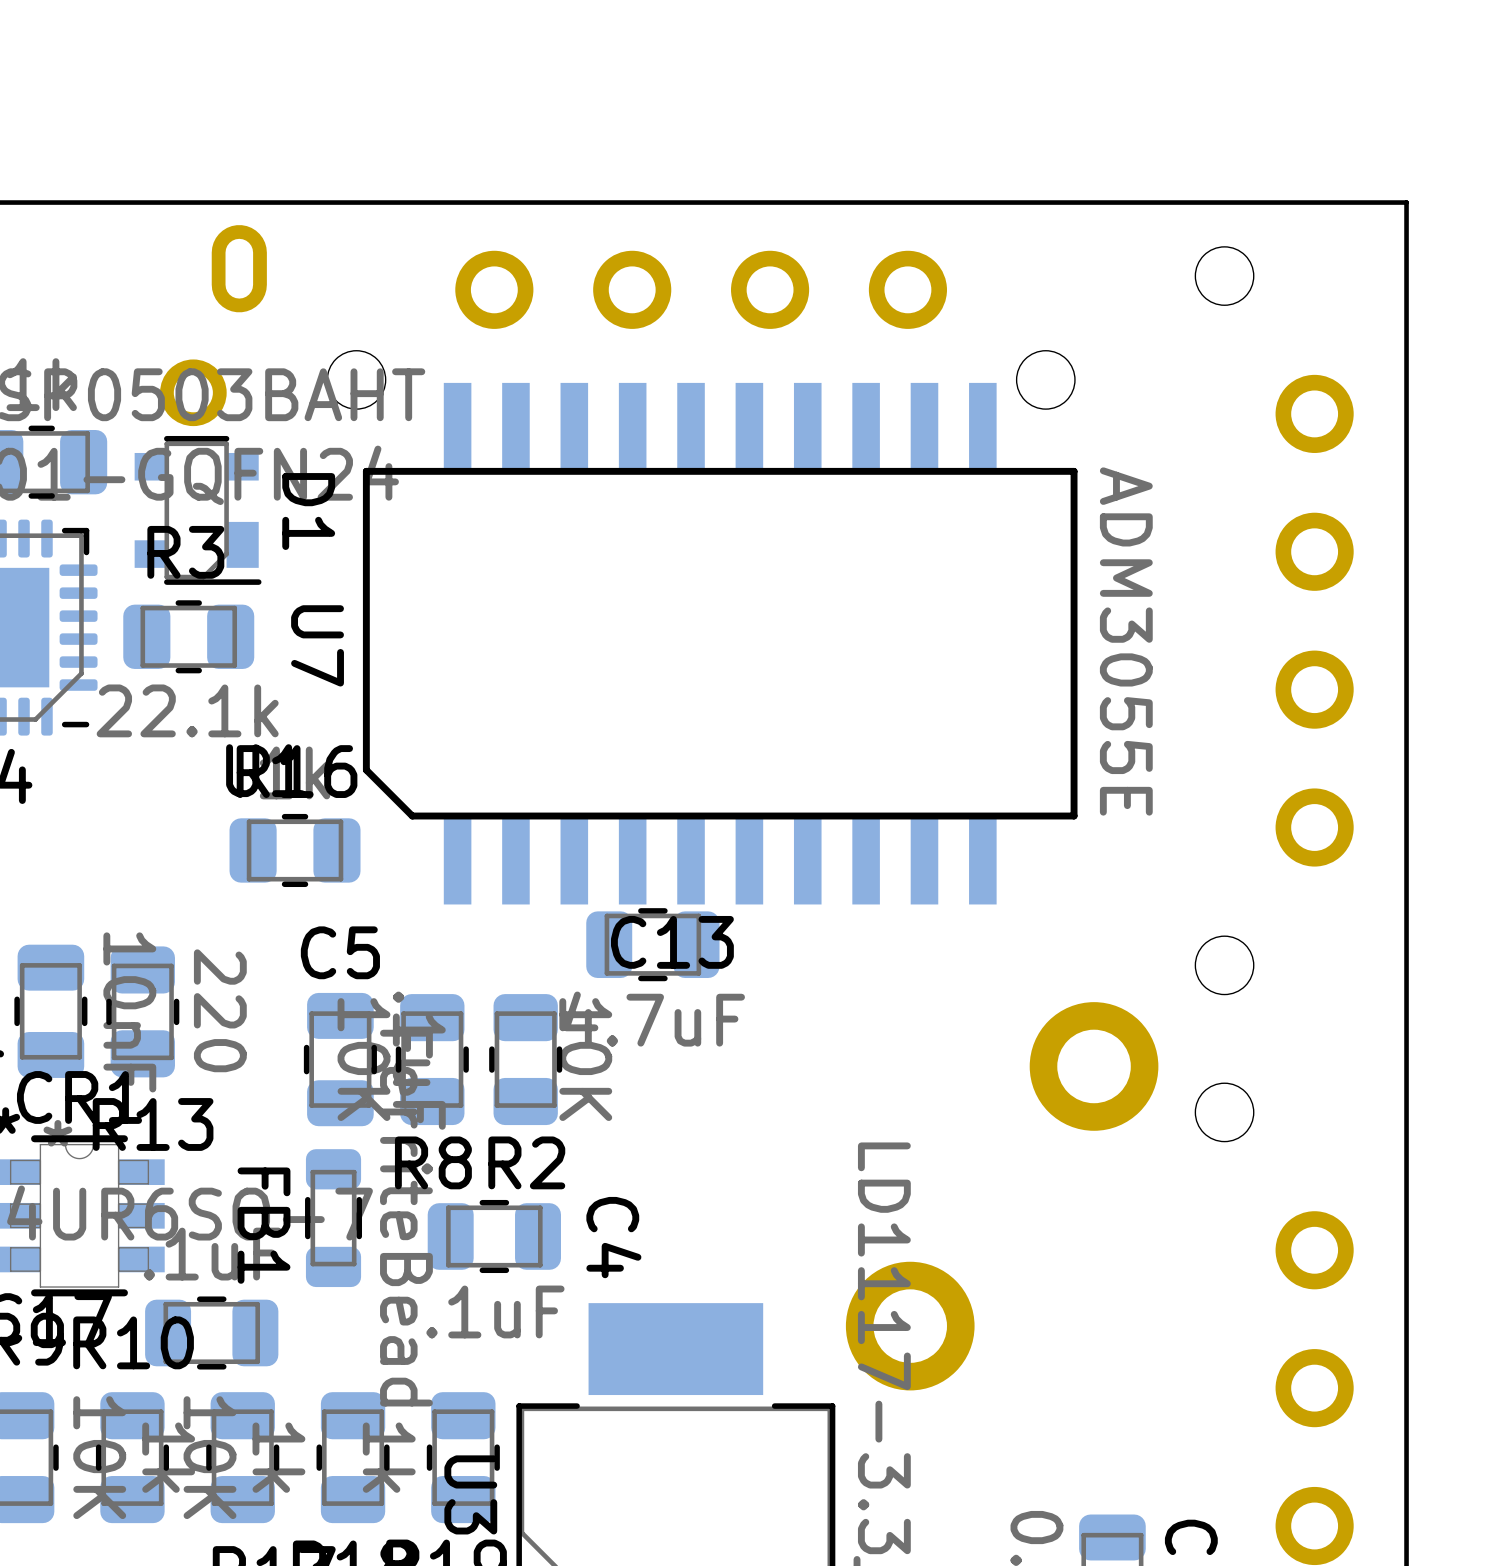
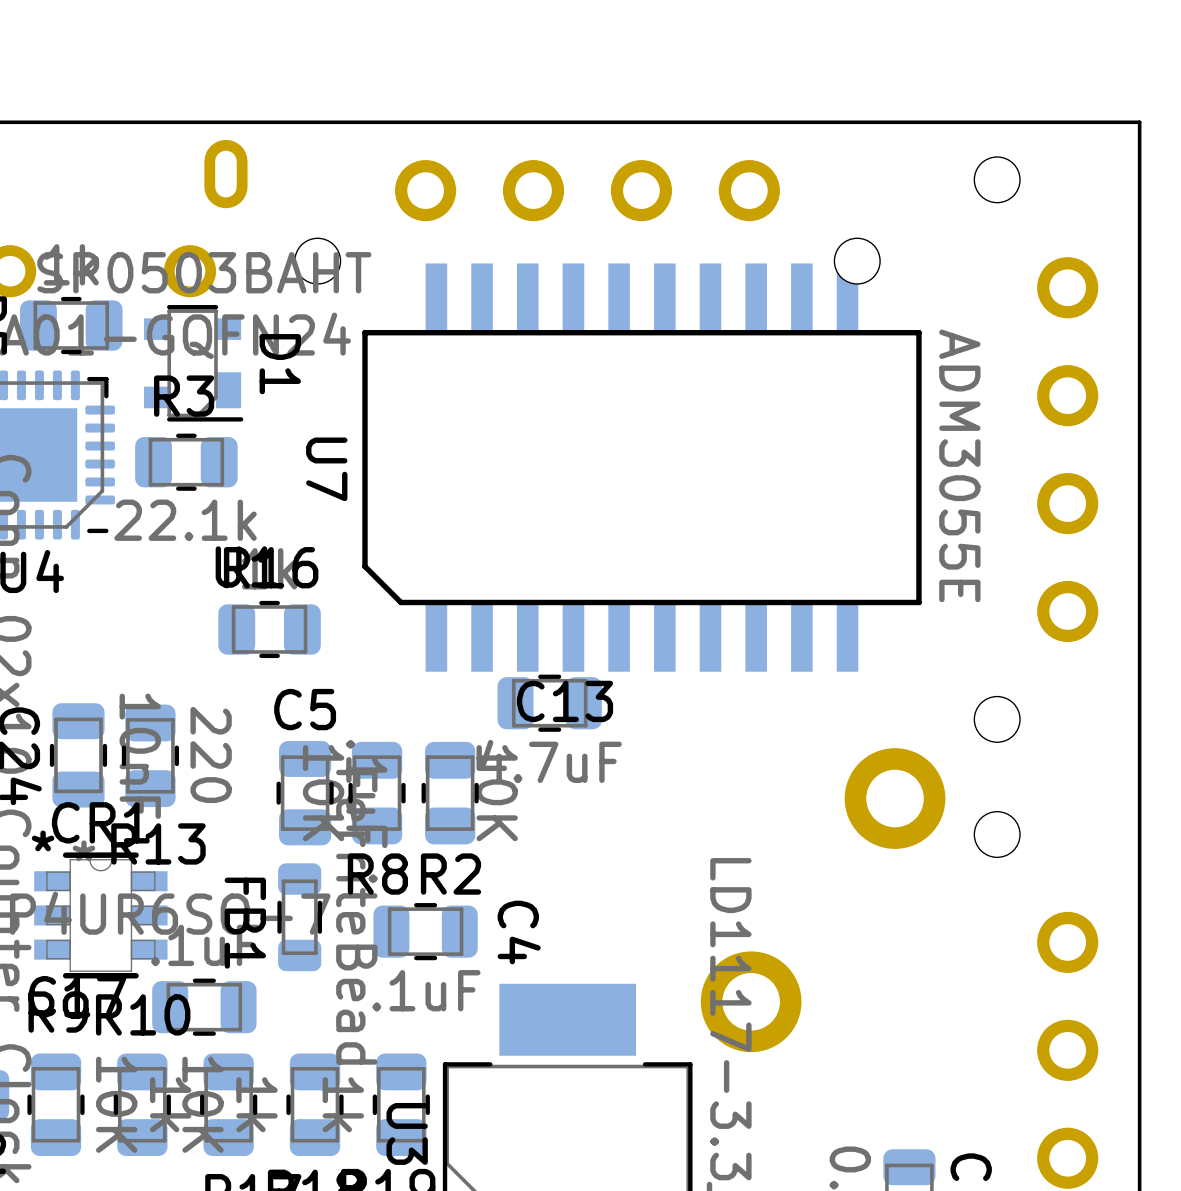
U7 position: (720, 643) -> (641, 467)

